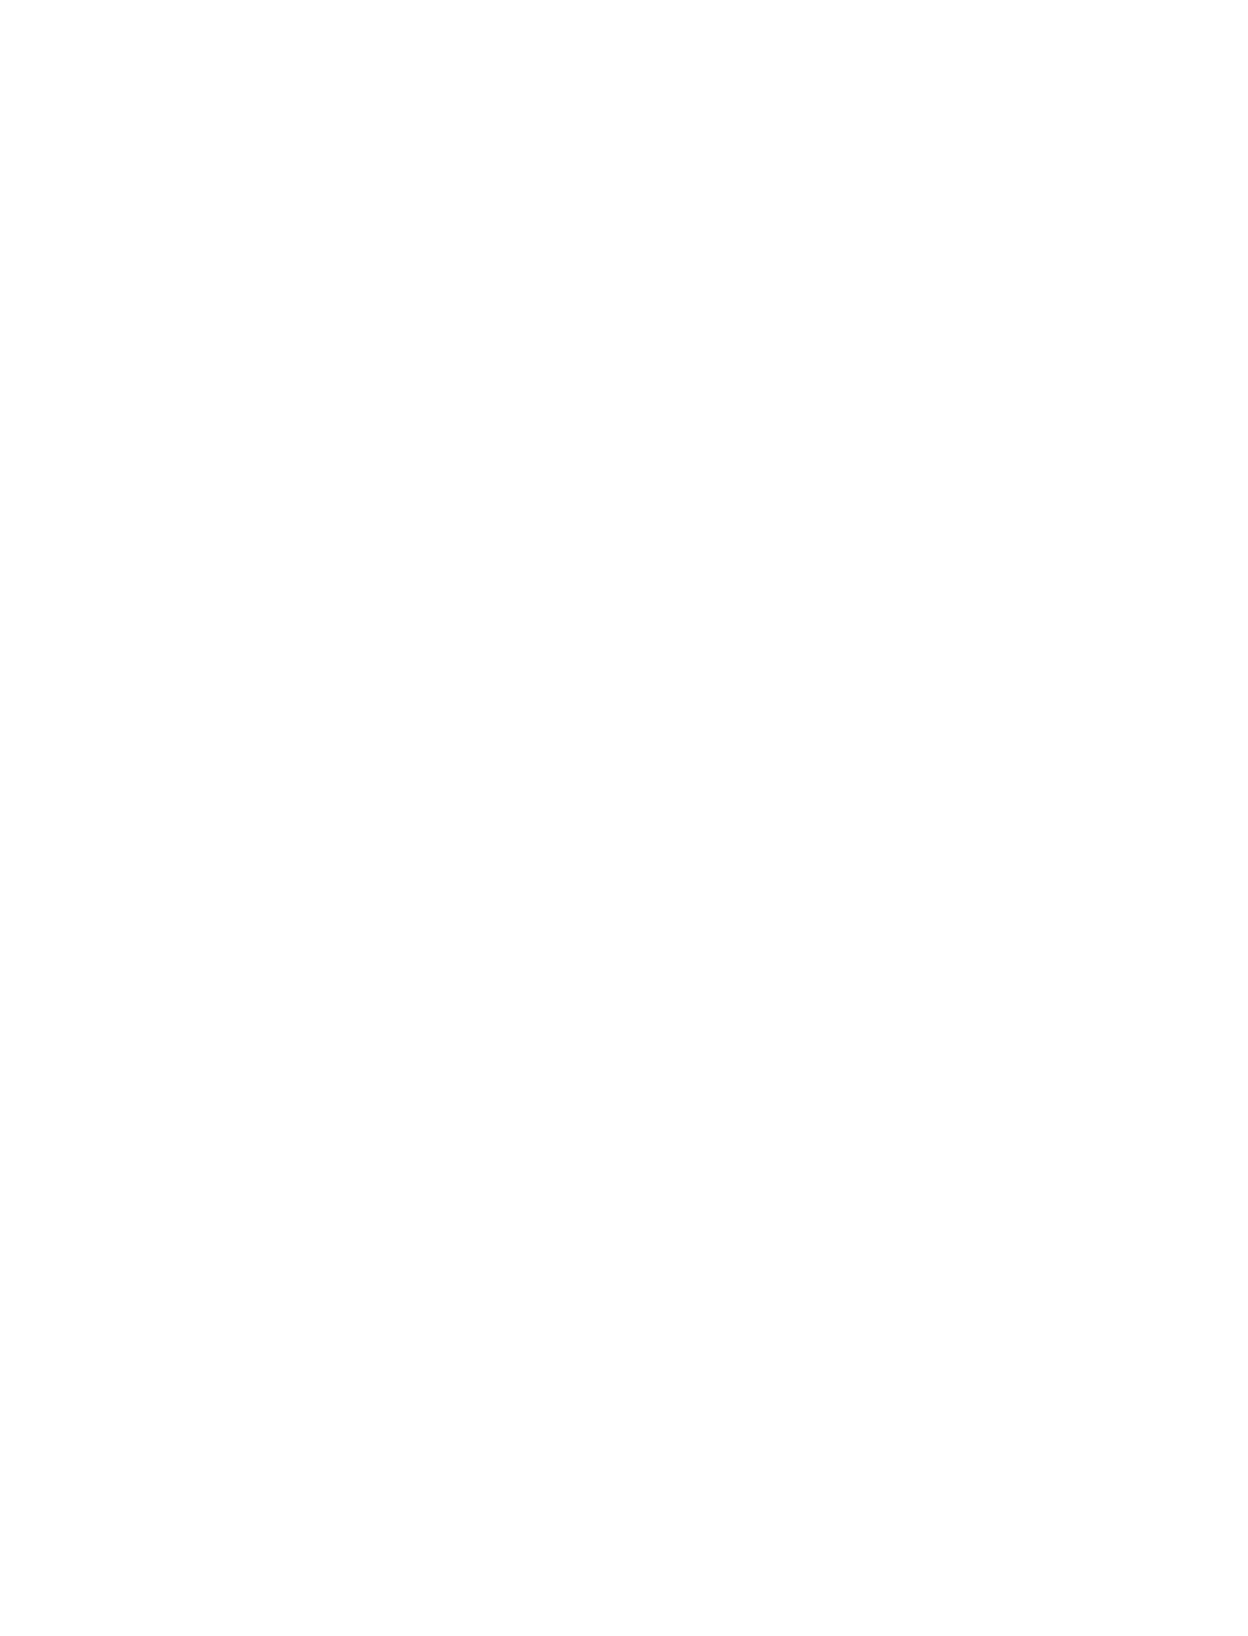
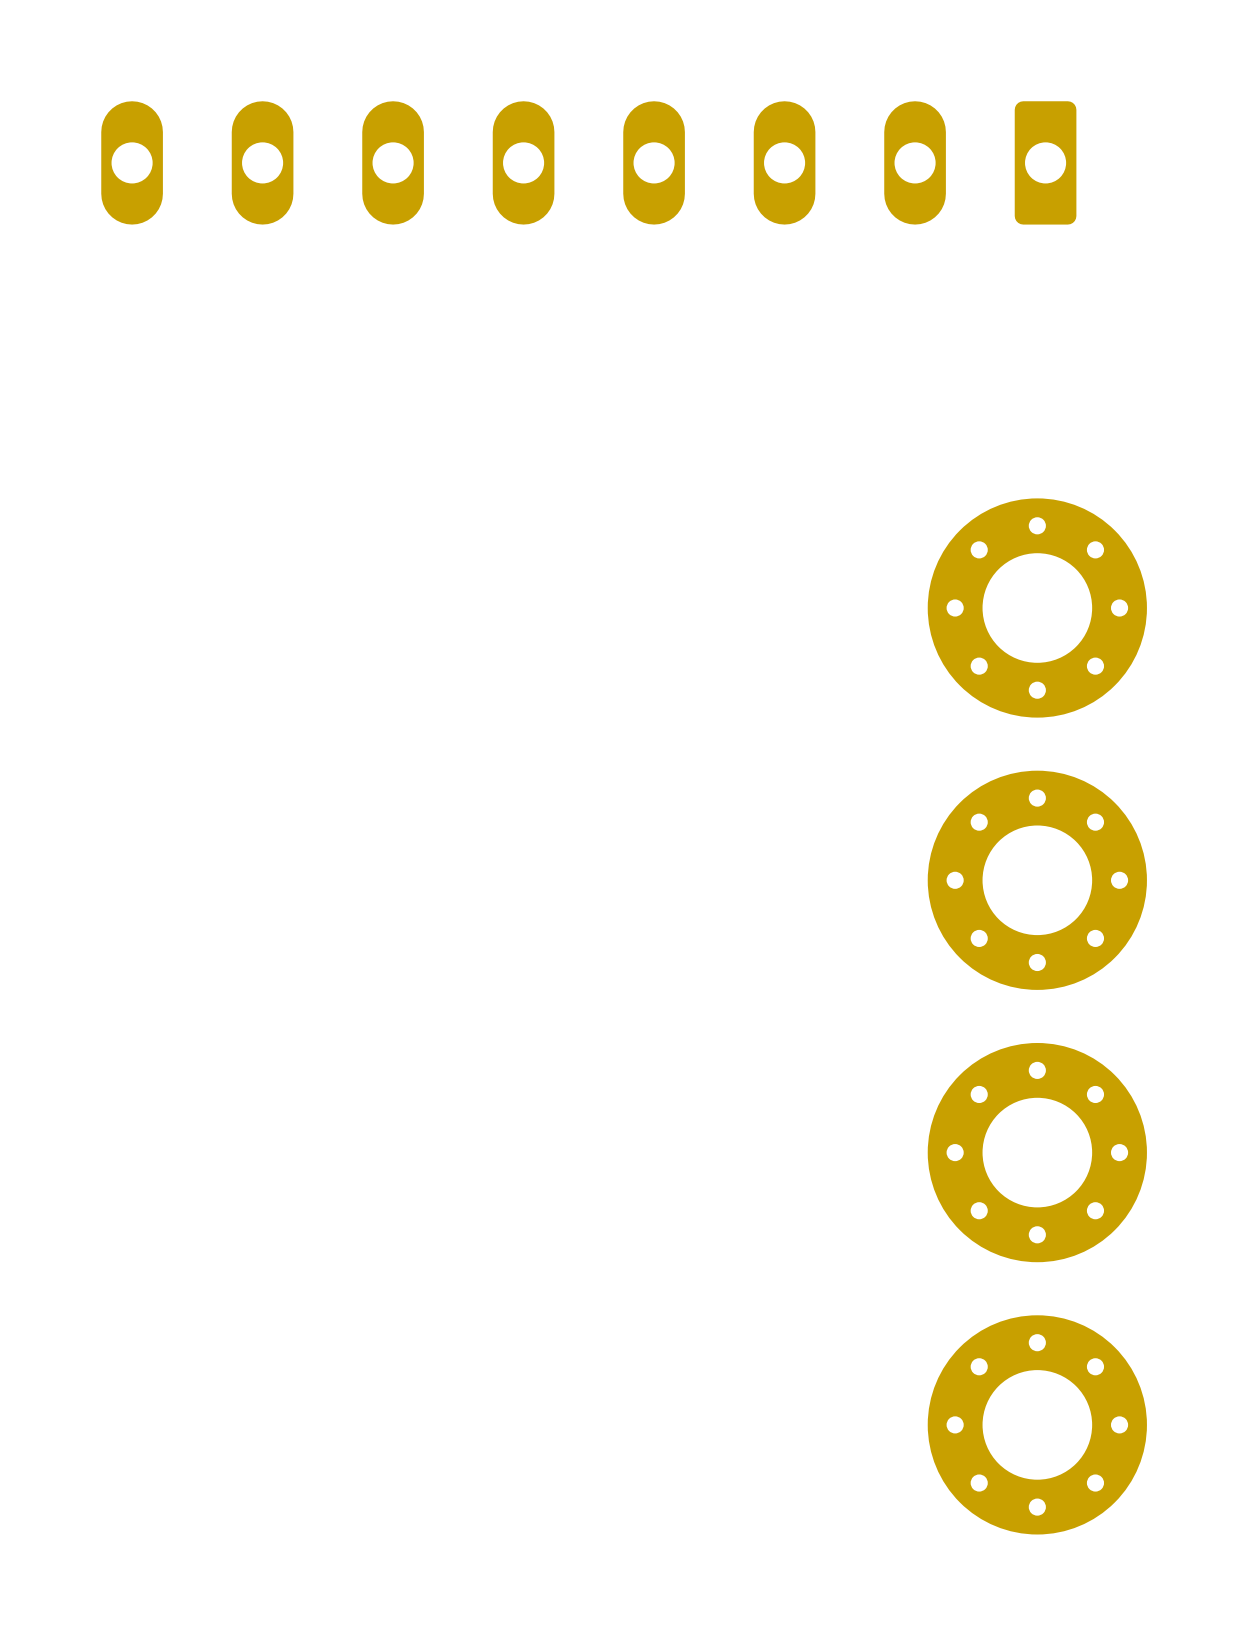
part: none -> (588, 162)
part: none -> (1037, 608)
part: none -> (1037, 880)
part: none -> (1037, 1152)
part: none -> (1037, 1424)

